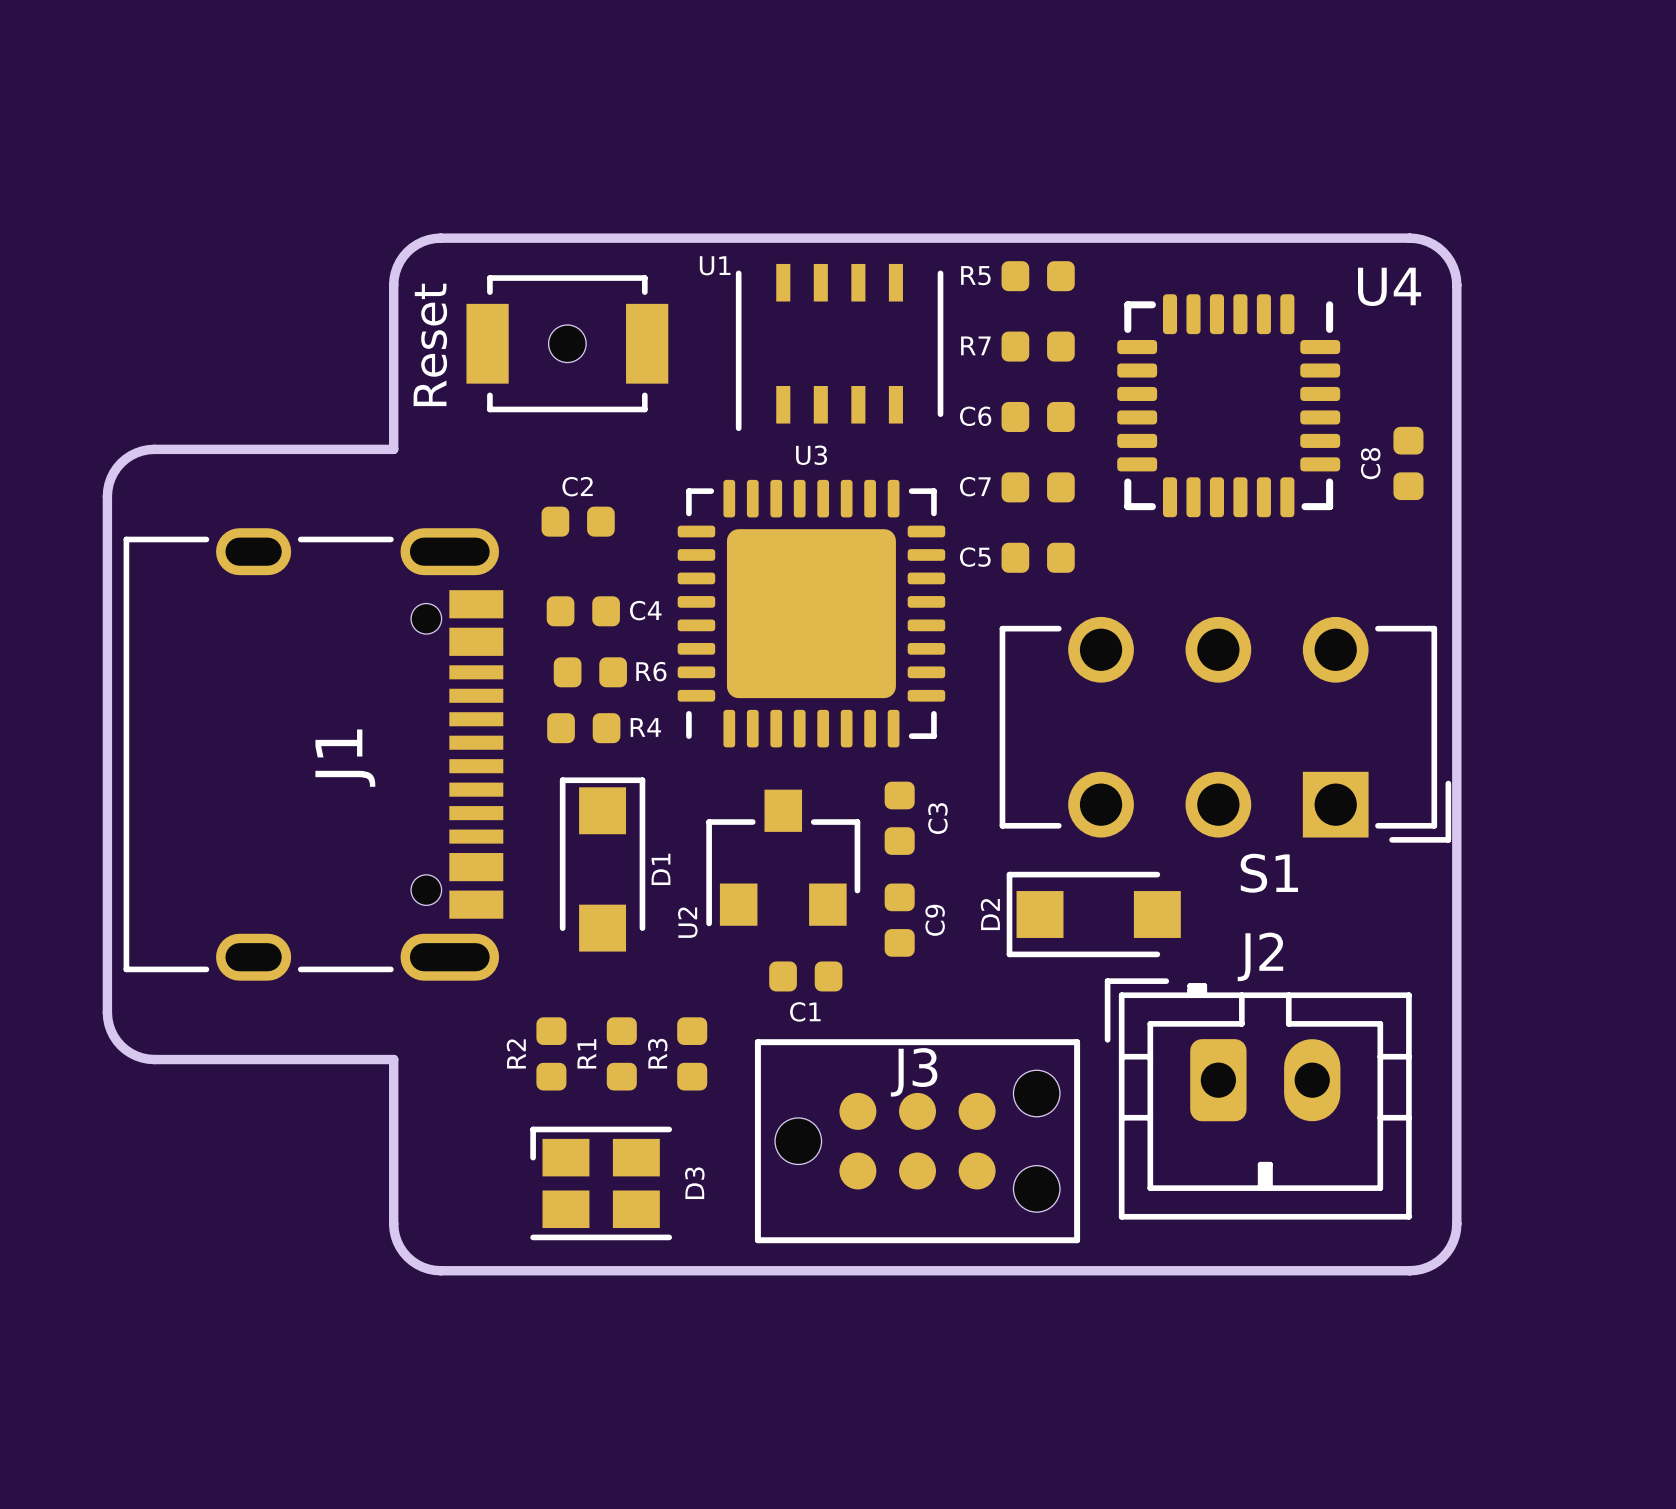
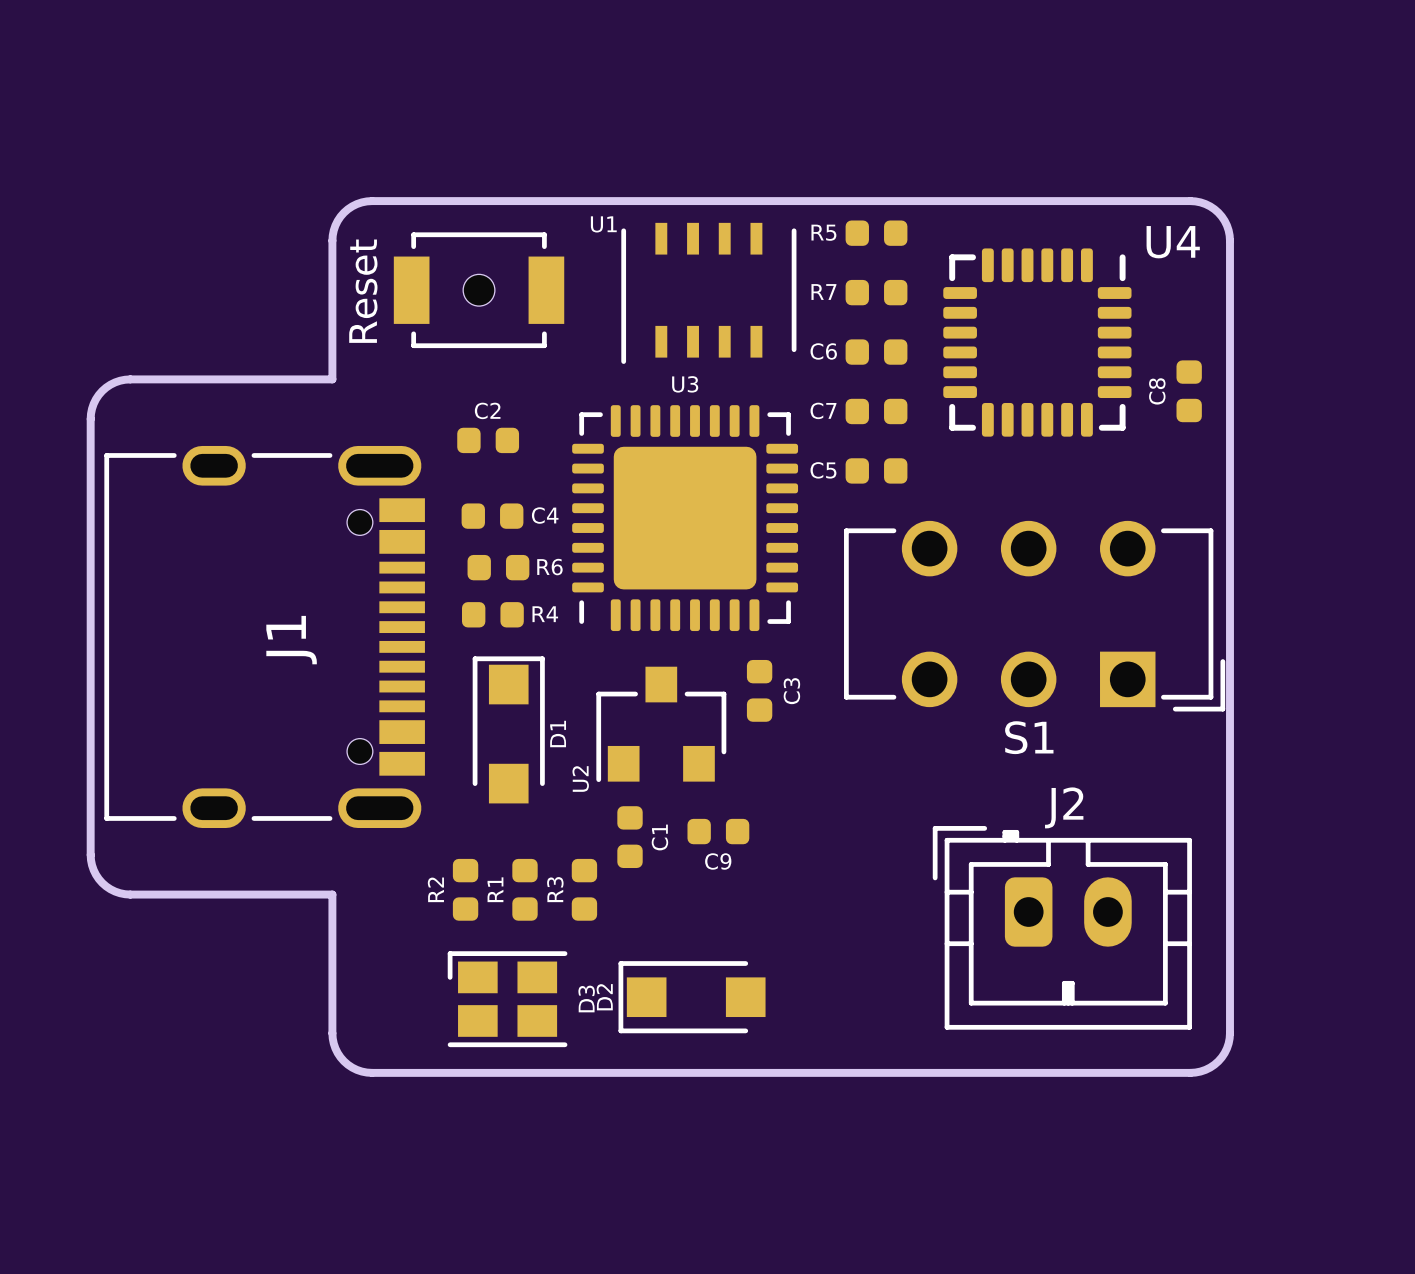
S1 name position: S1 (1269, 873) -> S1 (1029, 737)
D2 position: (1093, 914) -> (692, 997)
C9 rotation: 0° (899, 920) -> 90° clockwise (718, 831)
C9 position: (899, 920) -> (718, 831)
C1 rotation: 0° (805, 976) -> 90° clockwise (630, 837)
C1 position: (805, 976) -> (630, 837)
J3: (917, 1141) -> none

